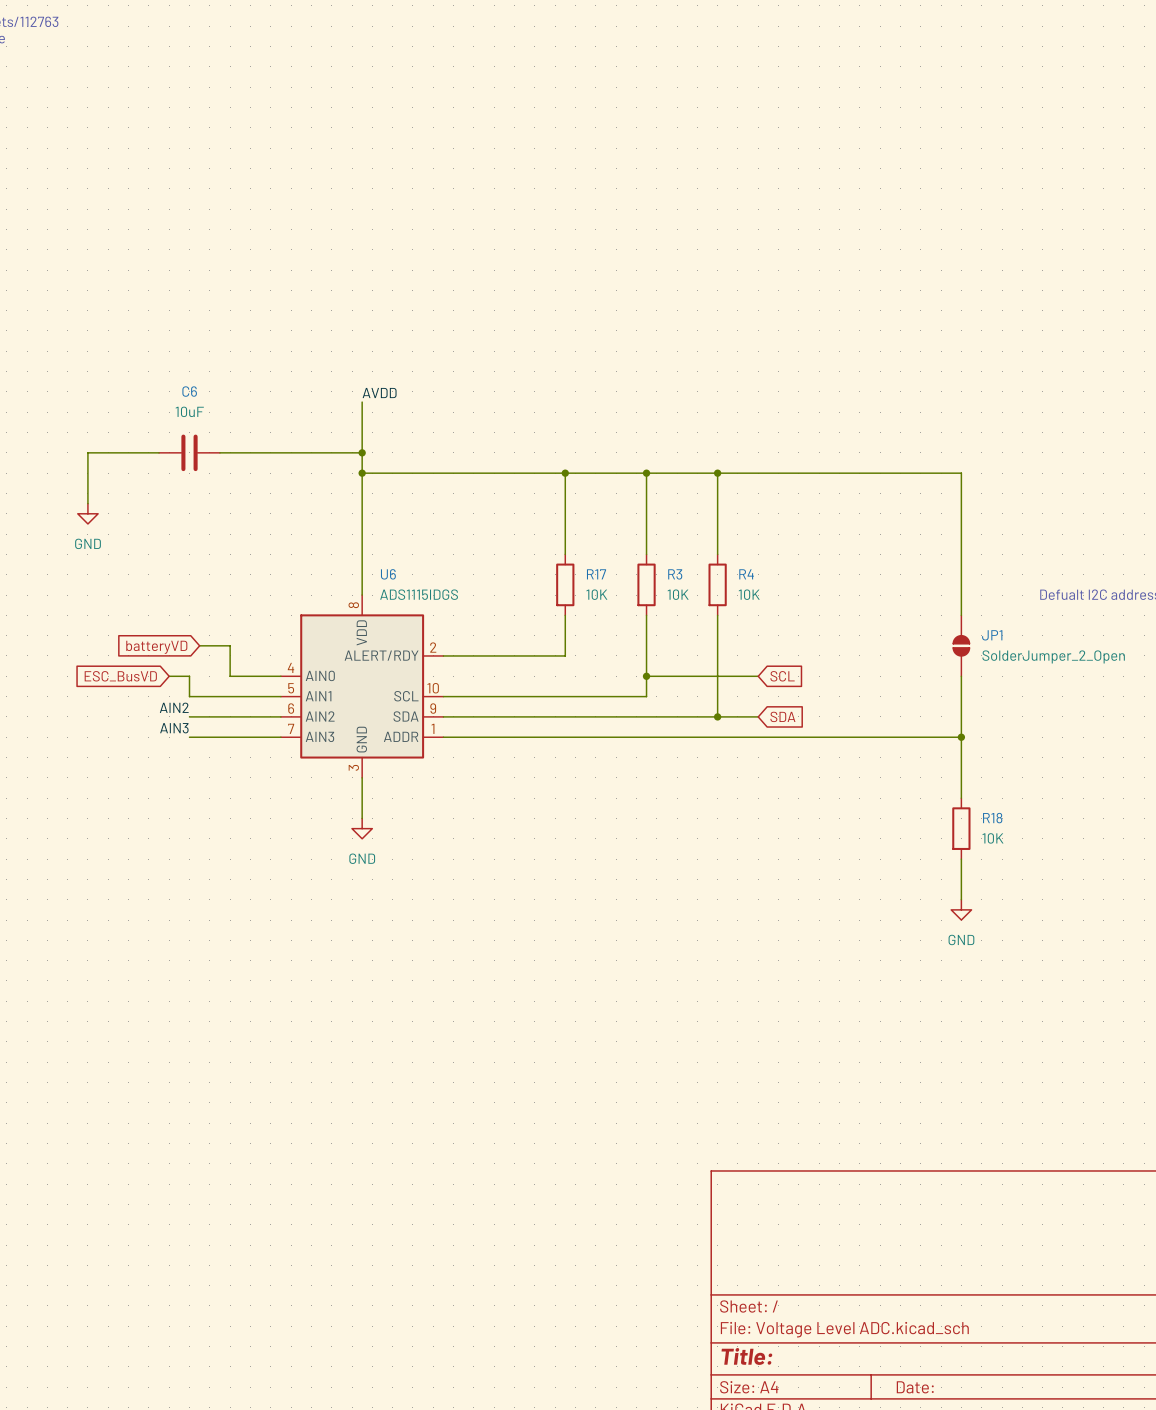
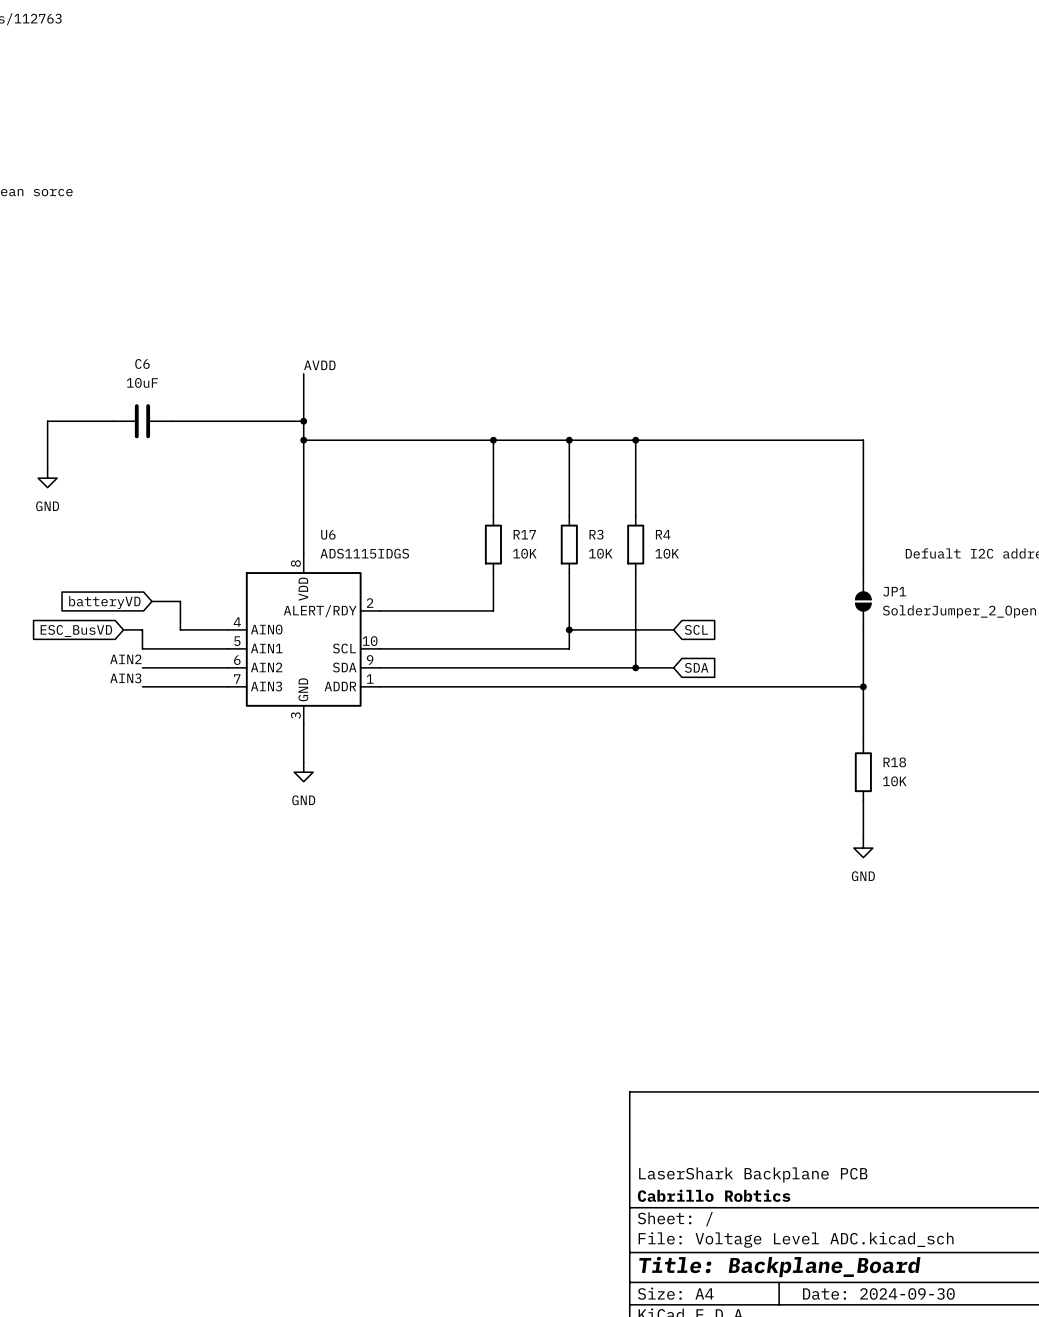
title block: none -> LaserShark Backplane PCB (753, 1174)
title block: none -> Cabrillo Robtics (714, 1195)
title block: Title: (746, 1356) -> Title: Backplane_Board (779, 1267)
title block: Date: (915, 1387) -> Date: 2024-09-30 (878, 1293)

